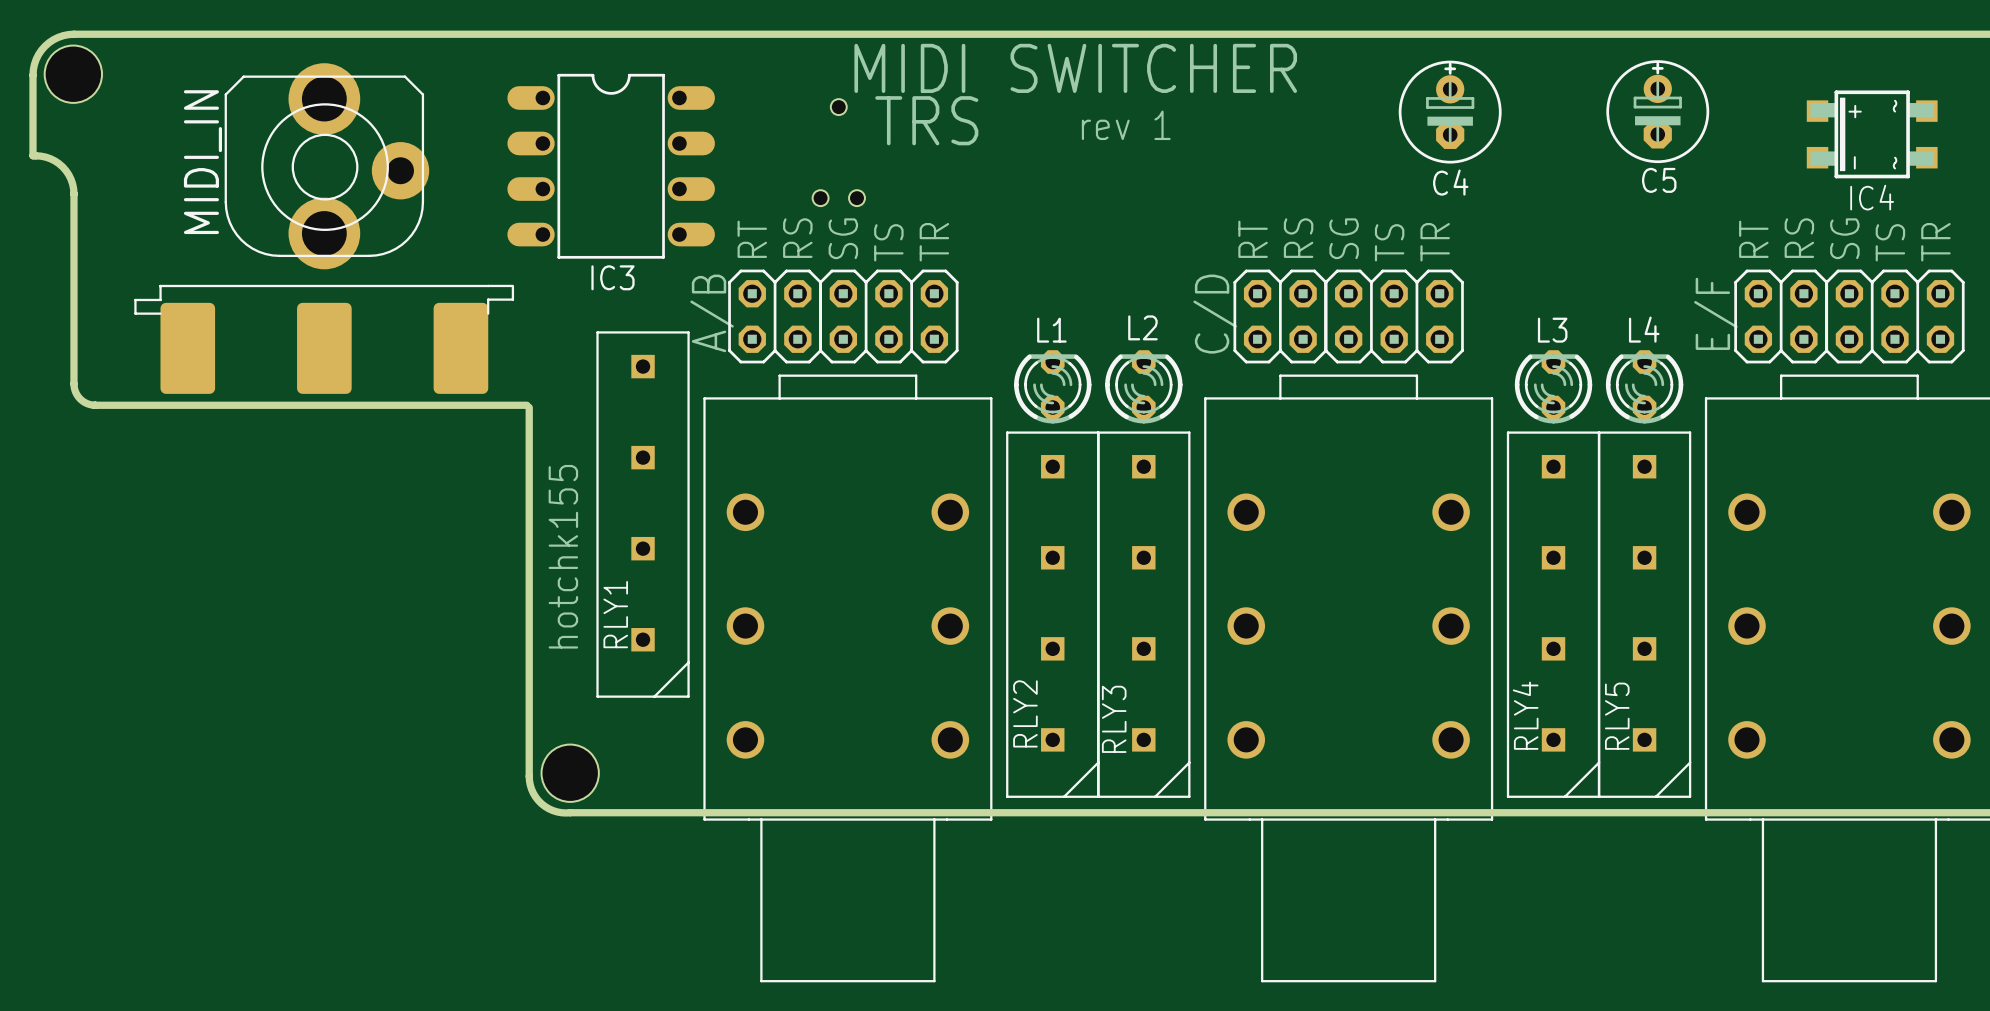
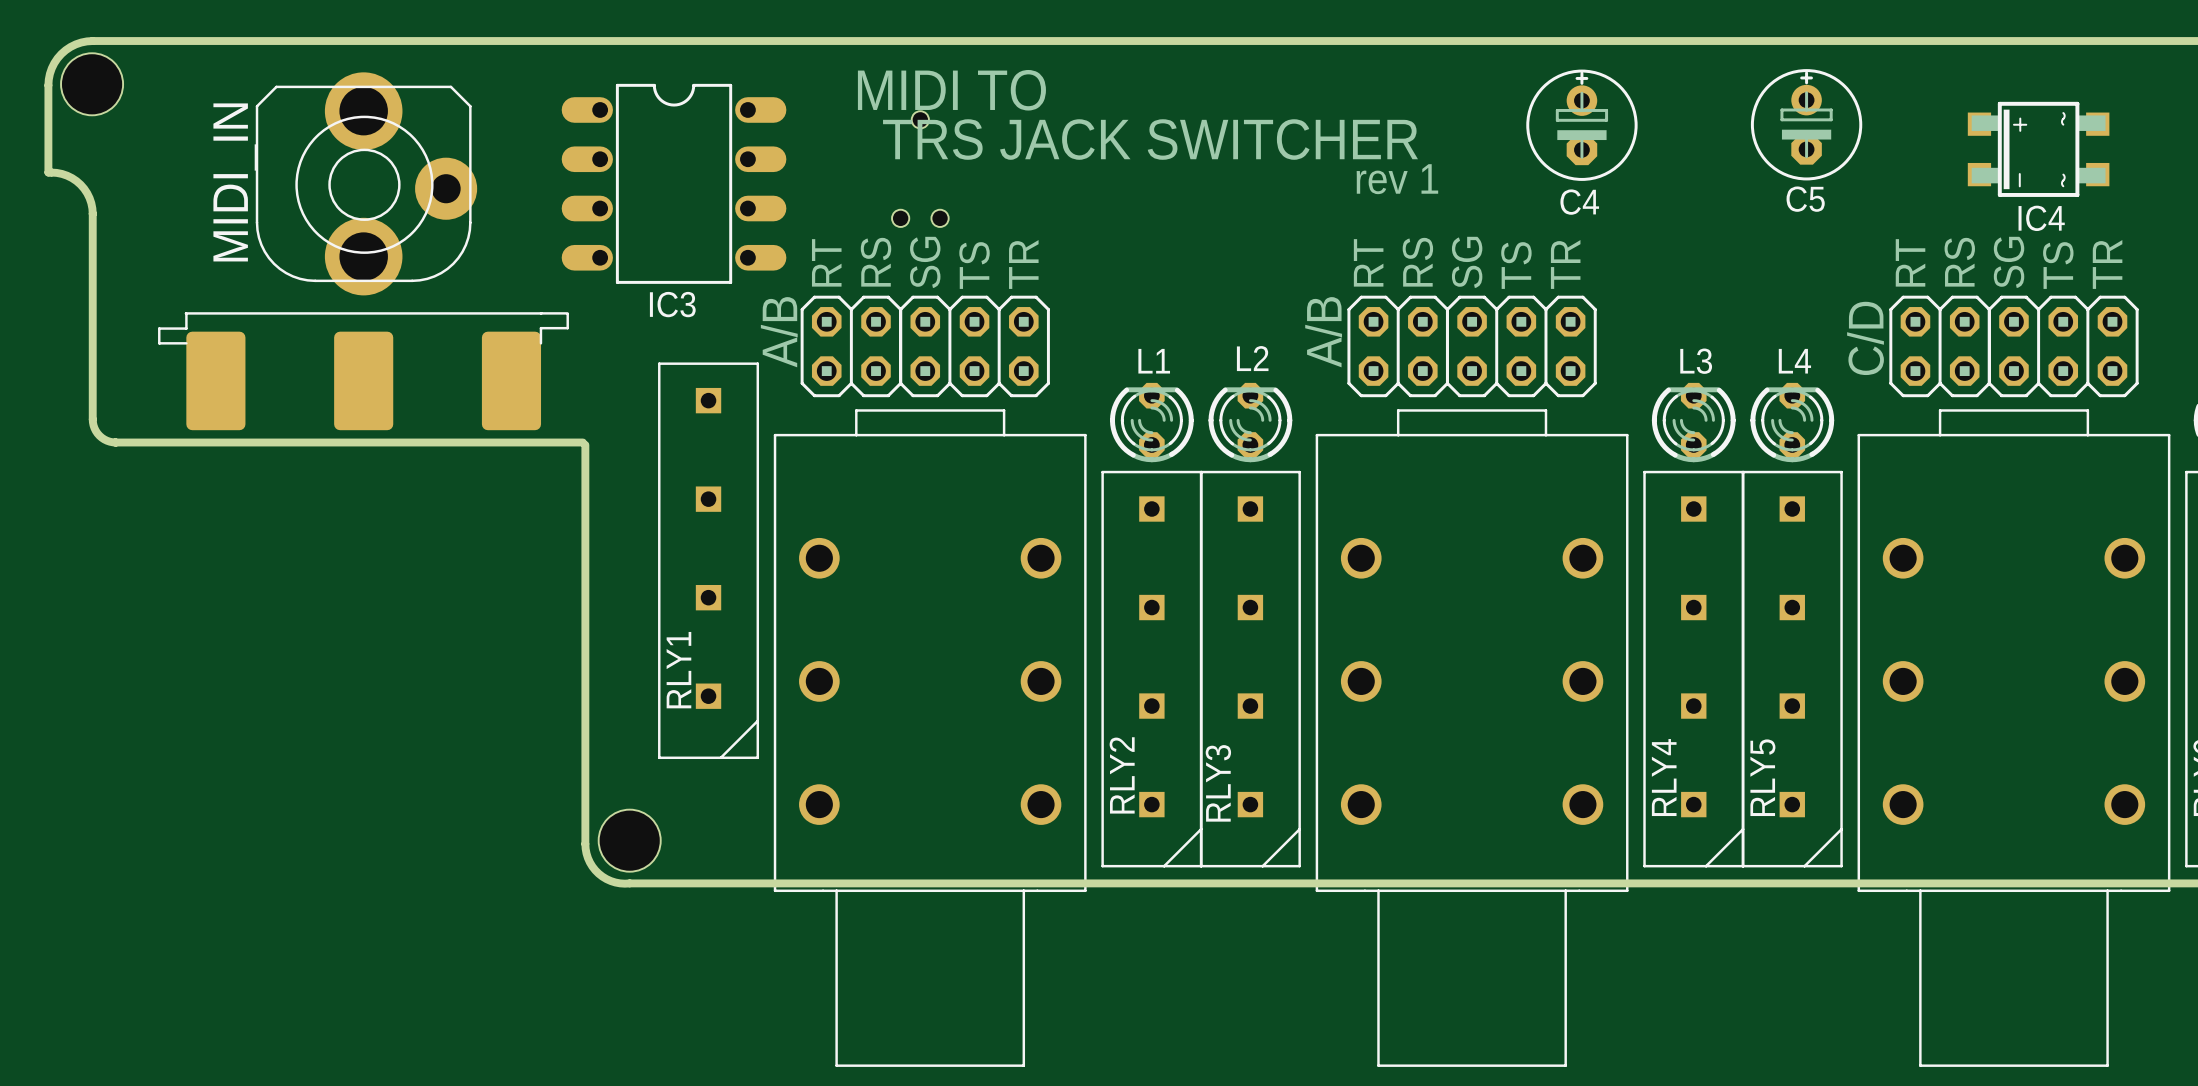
text: MIDI SWITCHER (1075, 68) -> none
text: none -> MIDI TO (951, 90)
text: TRS (926, 120) -> none
text: none -> TRS JACK SWITCHER (1150, 139)
text position: rev 1 (1126, 125) -> rev 1 (1397, 179)
text: E/F (1715, 313) -> C/D (1865, 338)
text: C/D (1215, 314) -> A/B (1323, 332)
text: hotchk155 (563, 556) -> none

